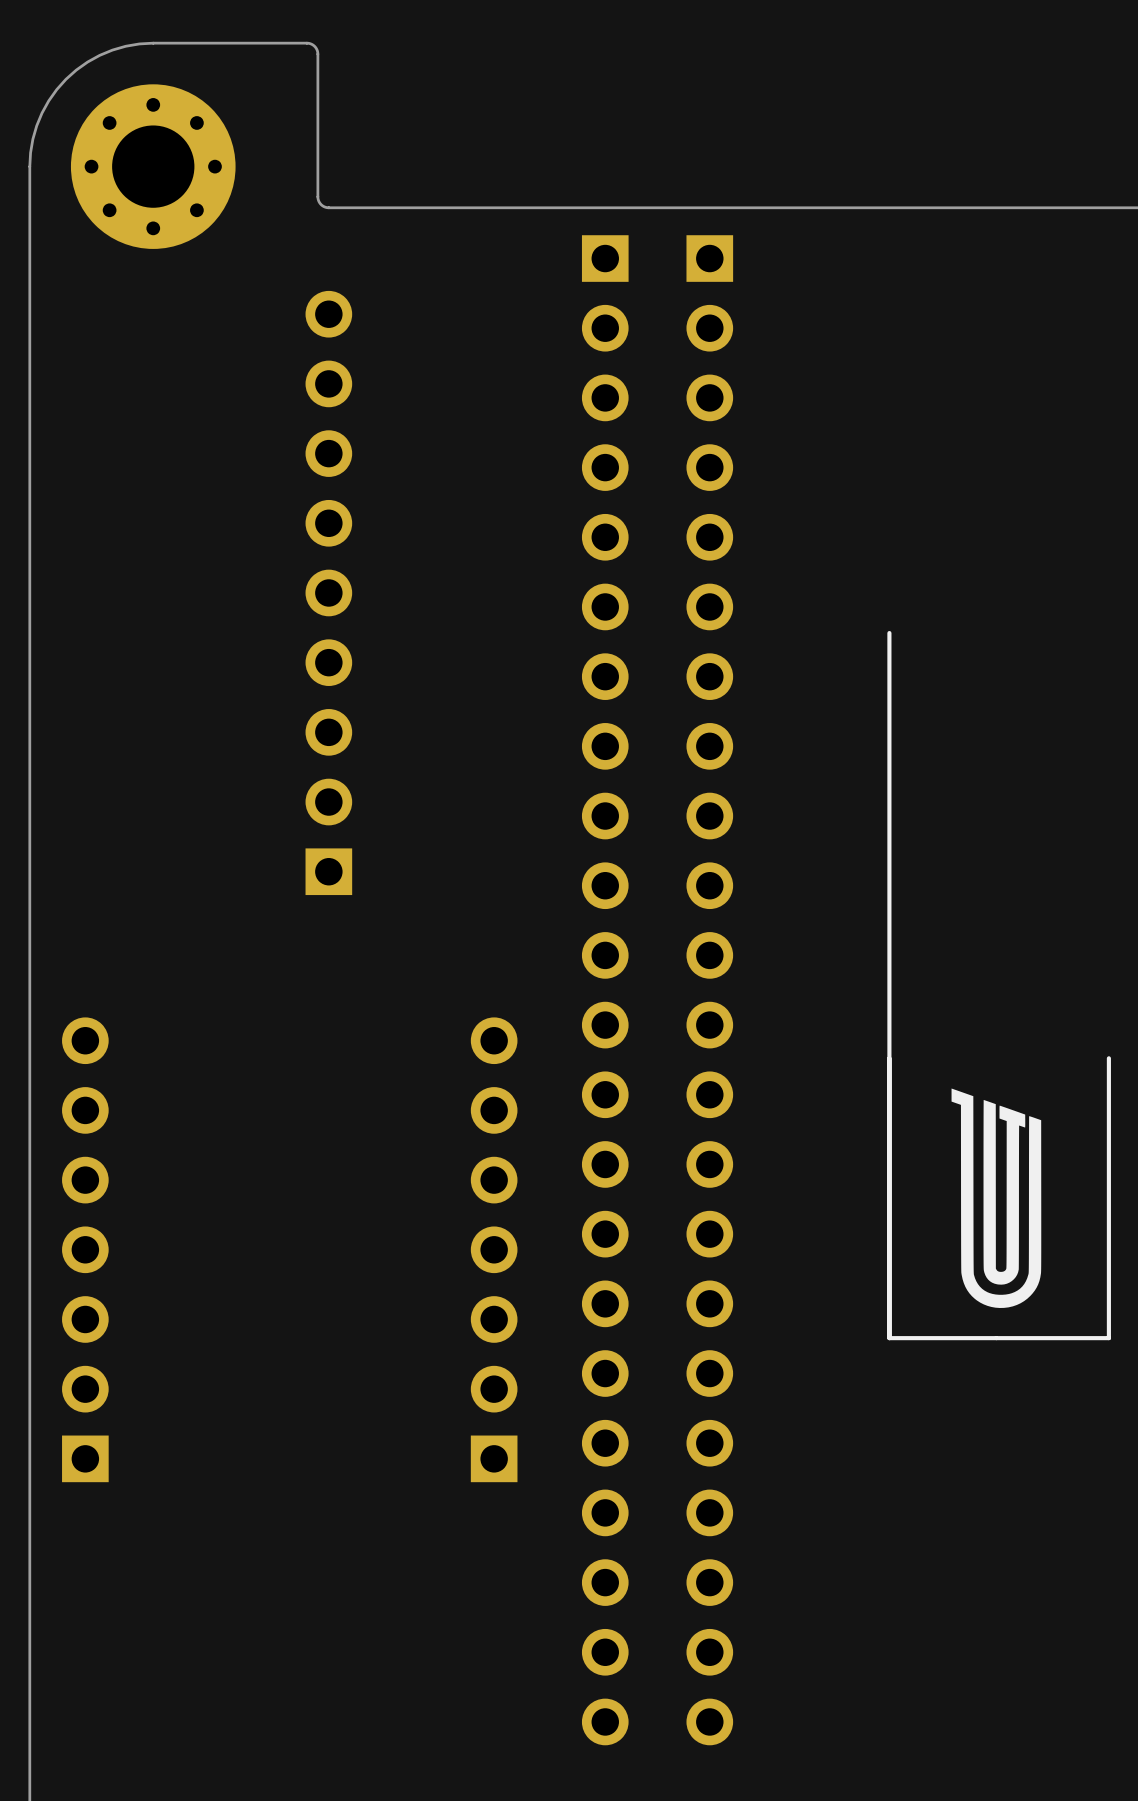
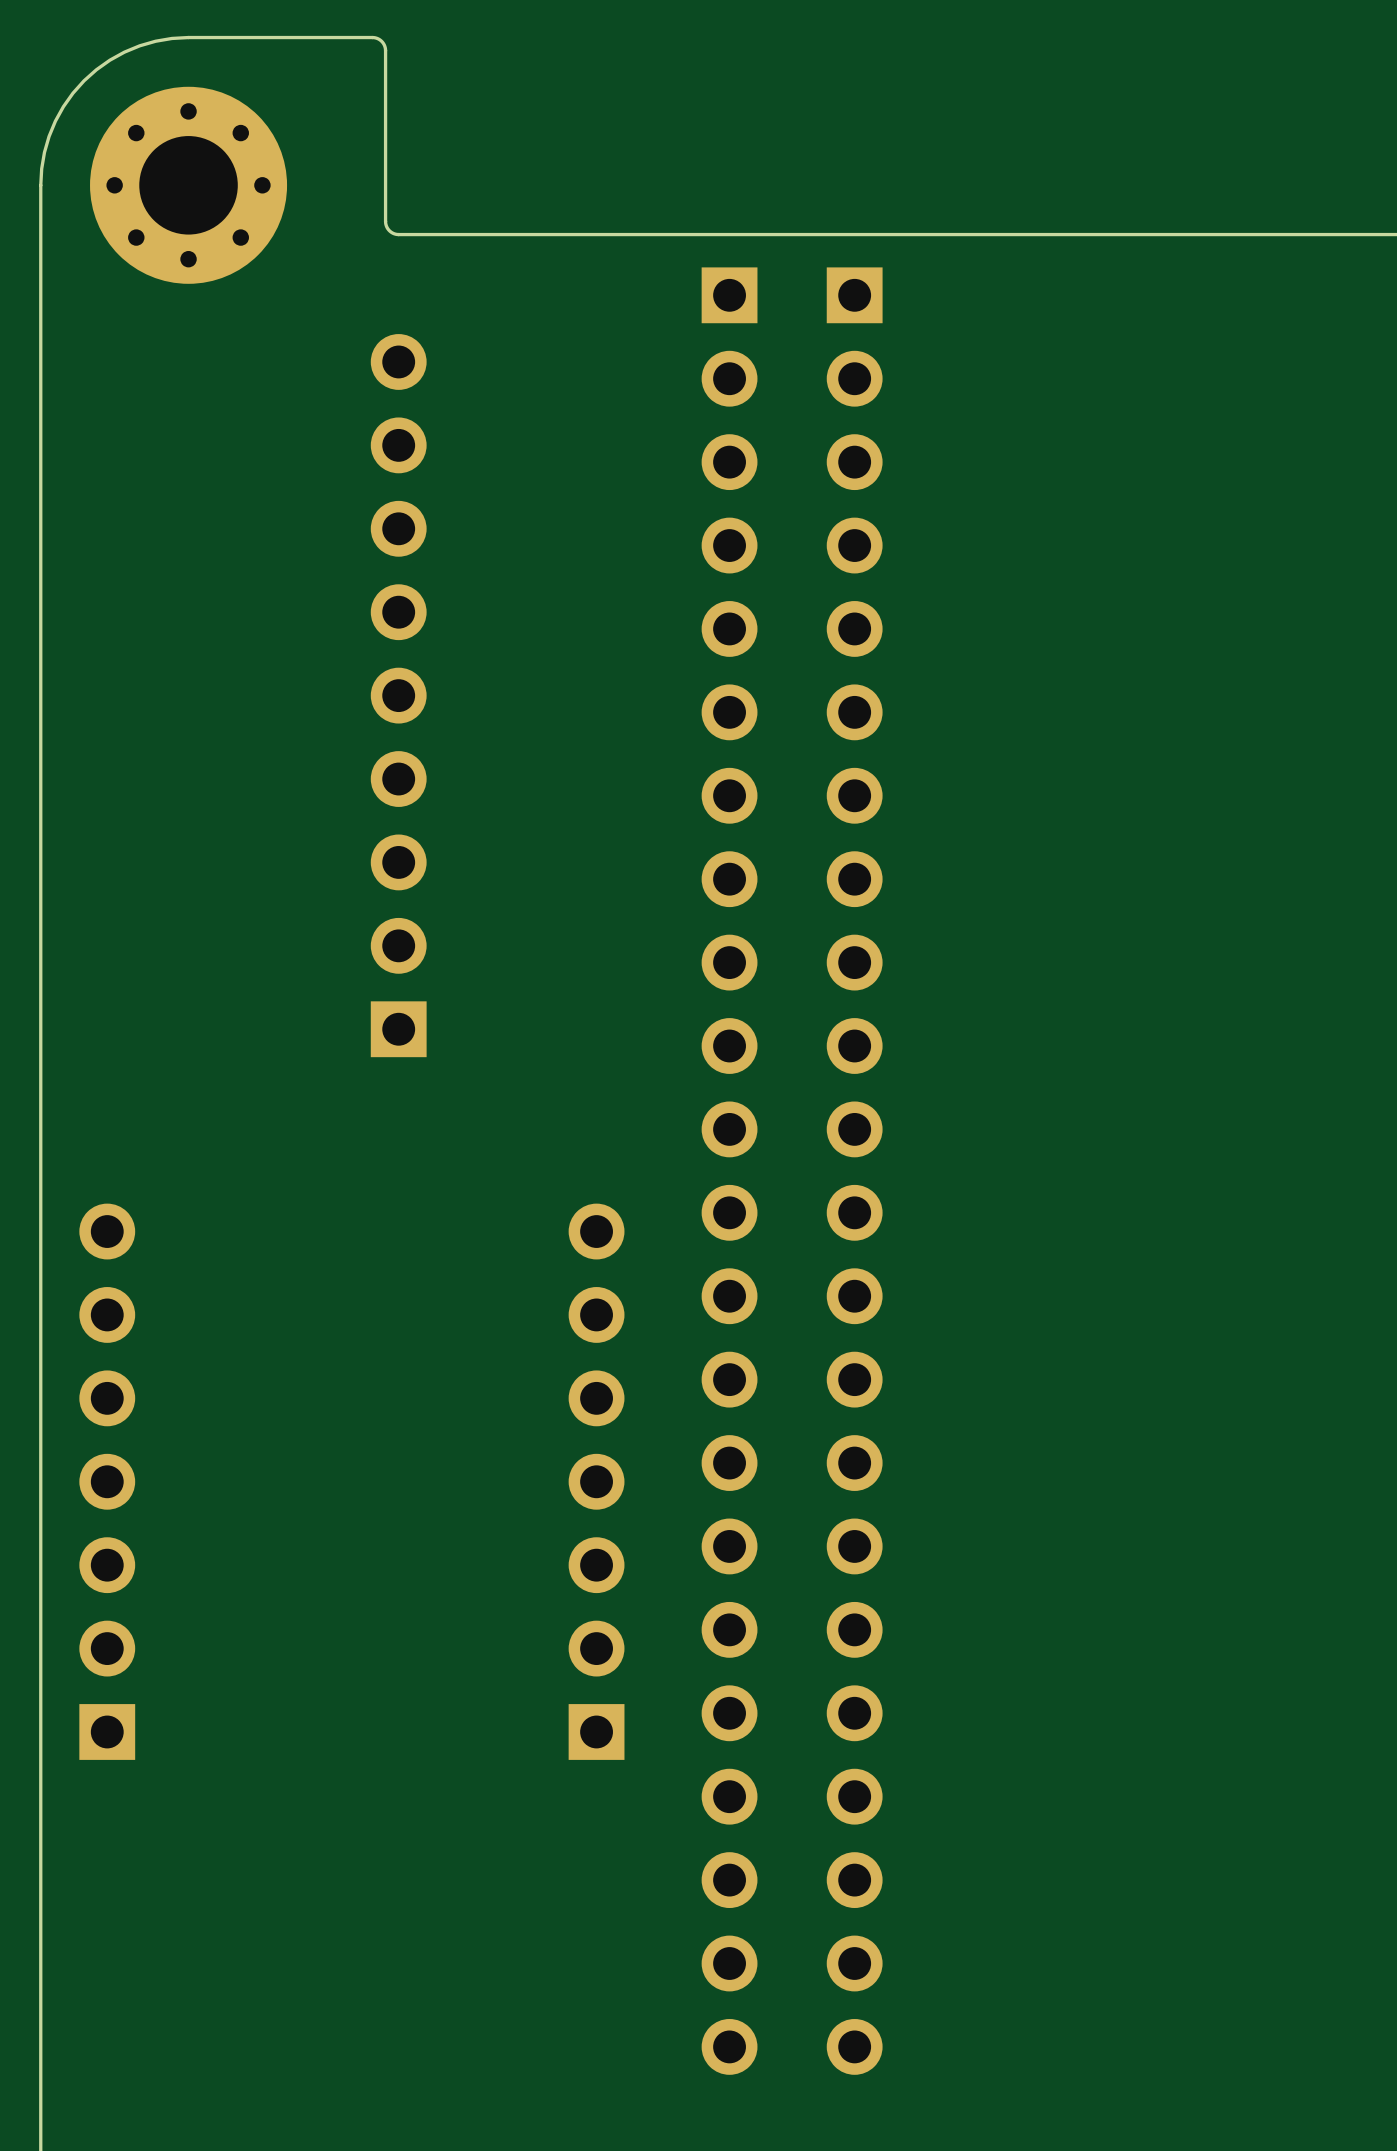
line: (889, 633) (889, 1338) (1108, 1338) (1108, 1058) -> none
drawing: [951, 1088, 1042, 1308] -> none

